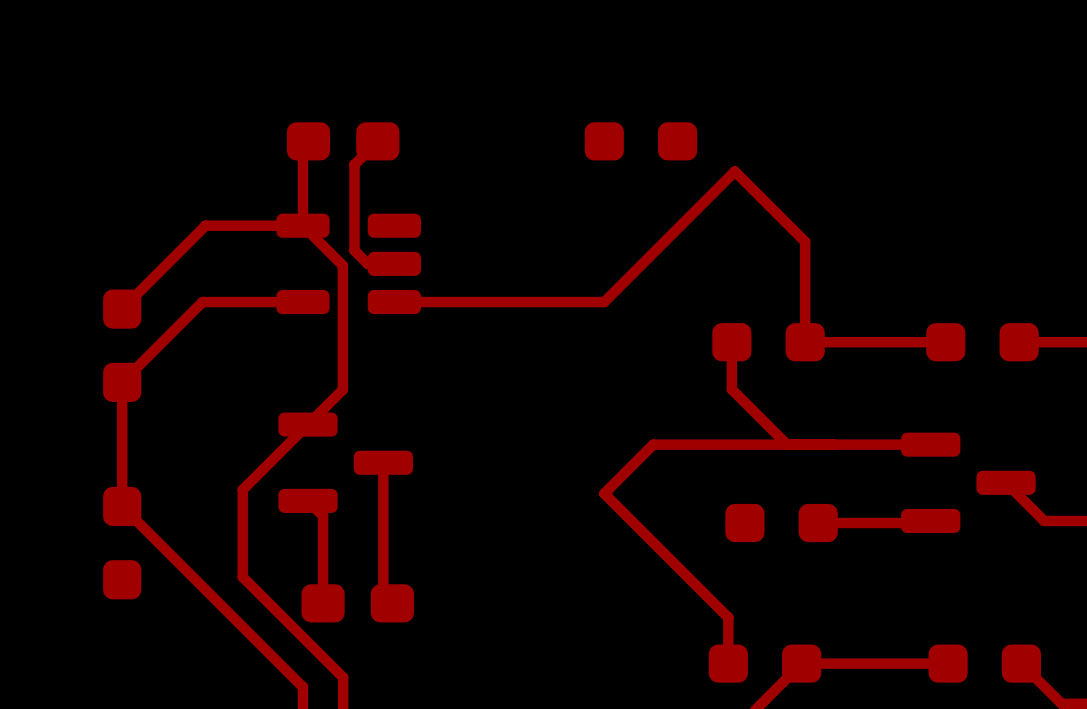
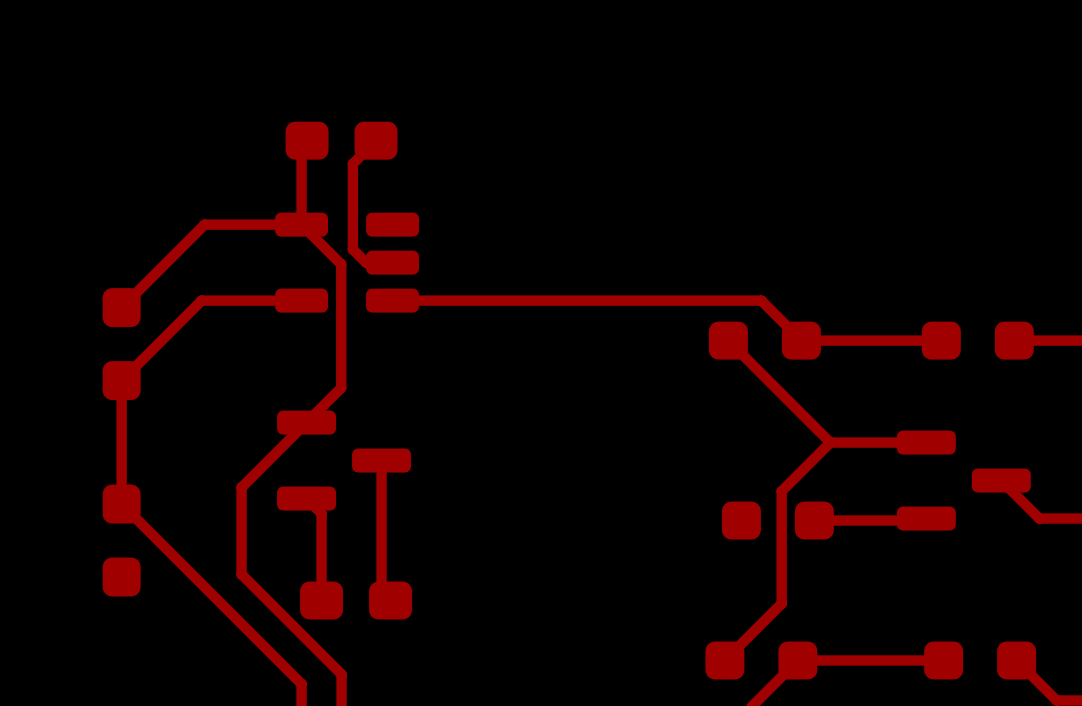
part: (640, 141) -> none
top track: (604, 302) (734, 171) (805, 241) (805, 342) -> (601, 300) (761, 300) (801, 340)
top track: (731, 342) (731, 389) (787, 444) -> none
top track: (834, 444) (653, 444) (604, 493) (728, 617) (728, 663) -> (728, 340) (830, 442) (781, 491) (781, 603) (724, 660)

